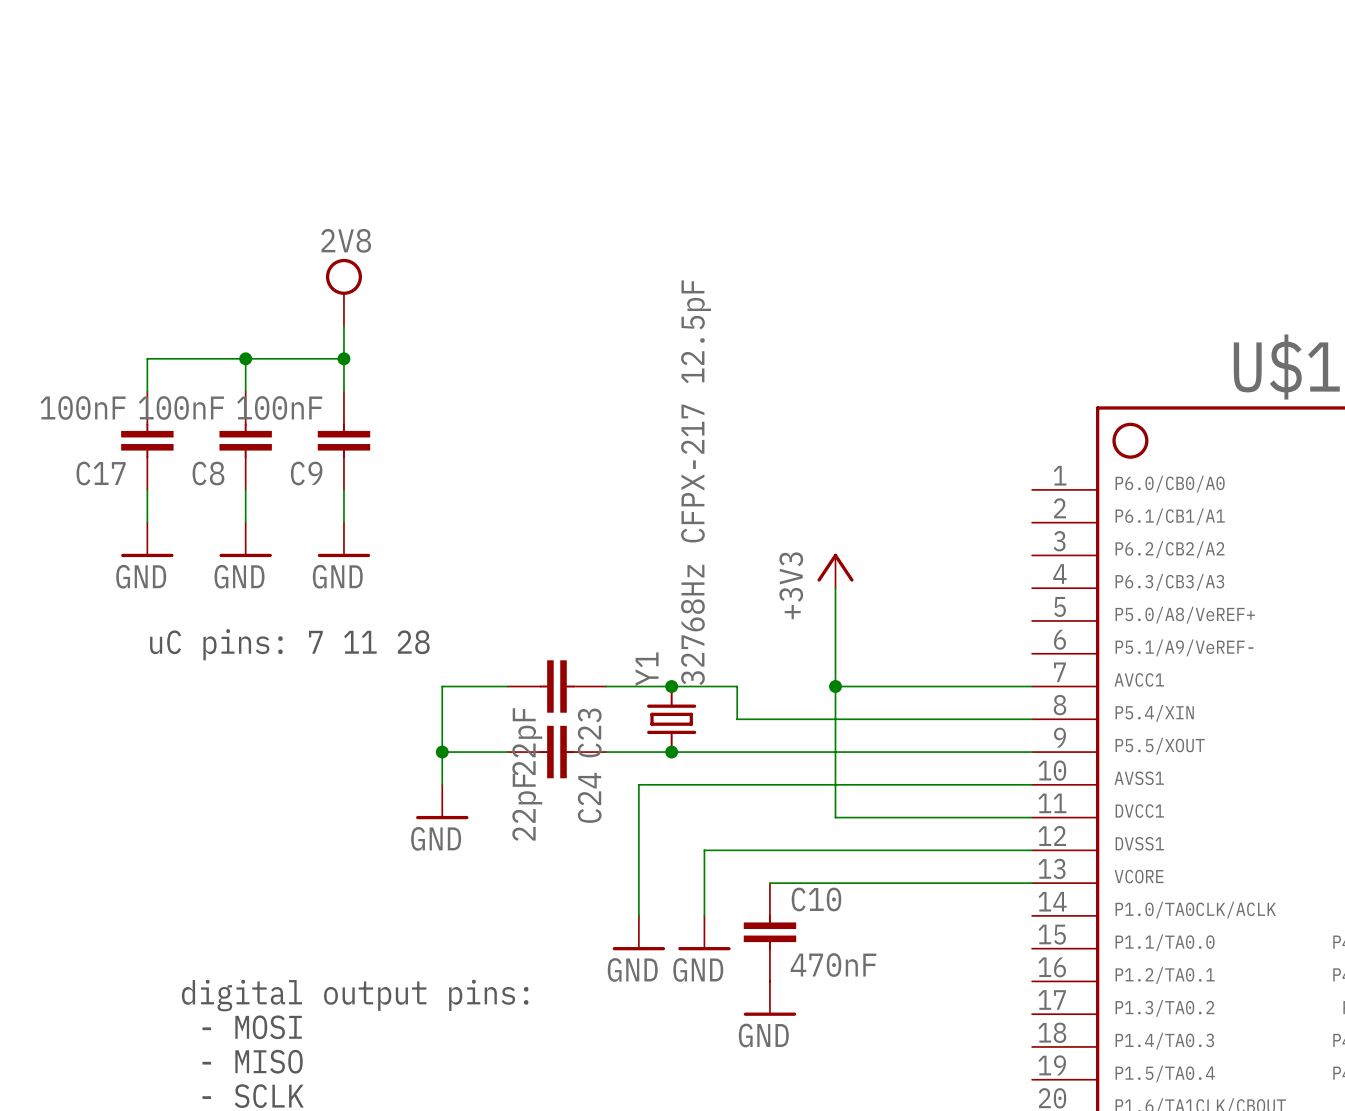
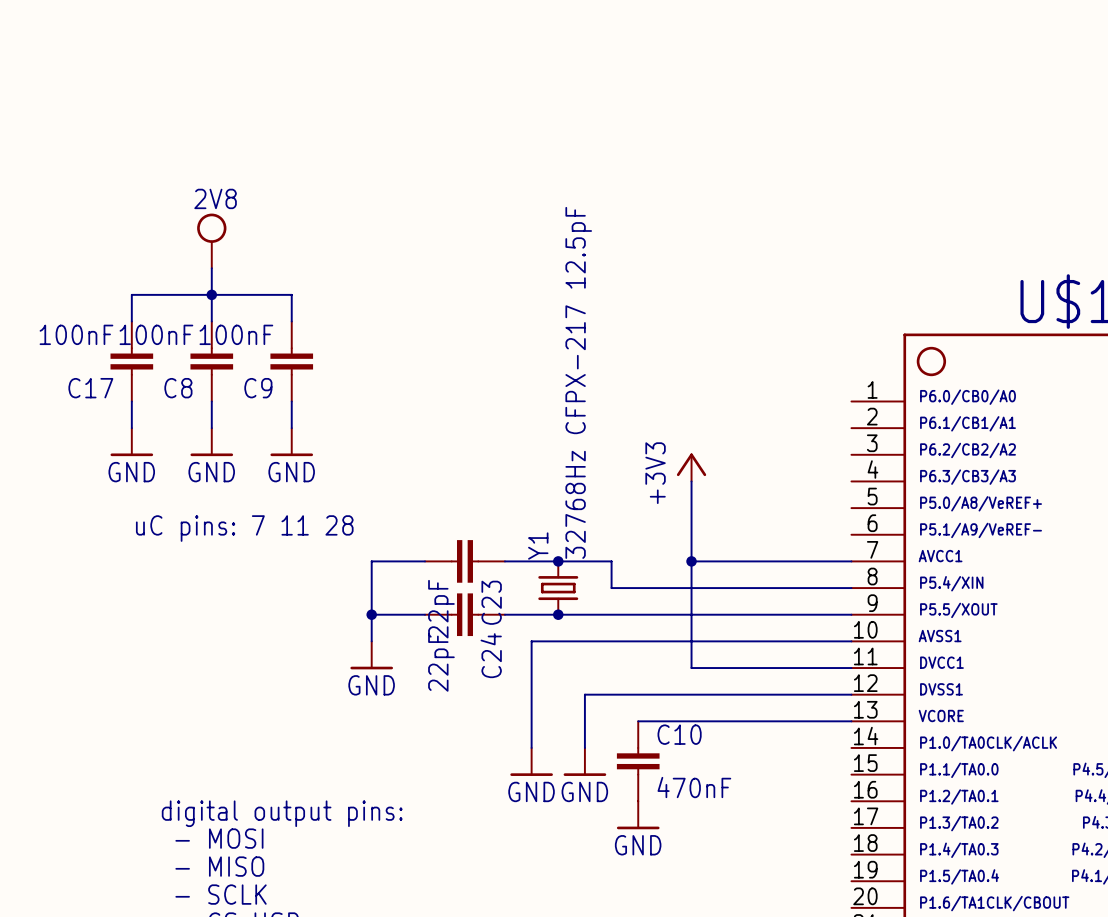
power symbol position: 2V8 (343, 292) -> 2V8 (211, 240)
wire: (343, 326) (343, 358) -> (211, 268) (211, 294)
junction: (343, 358) -> none

